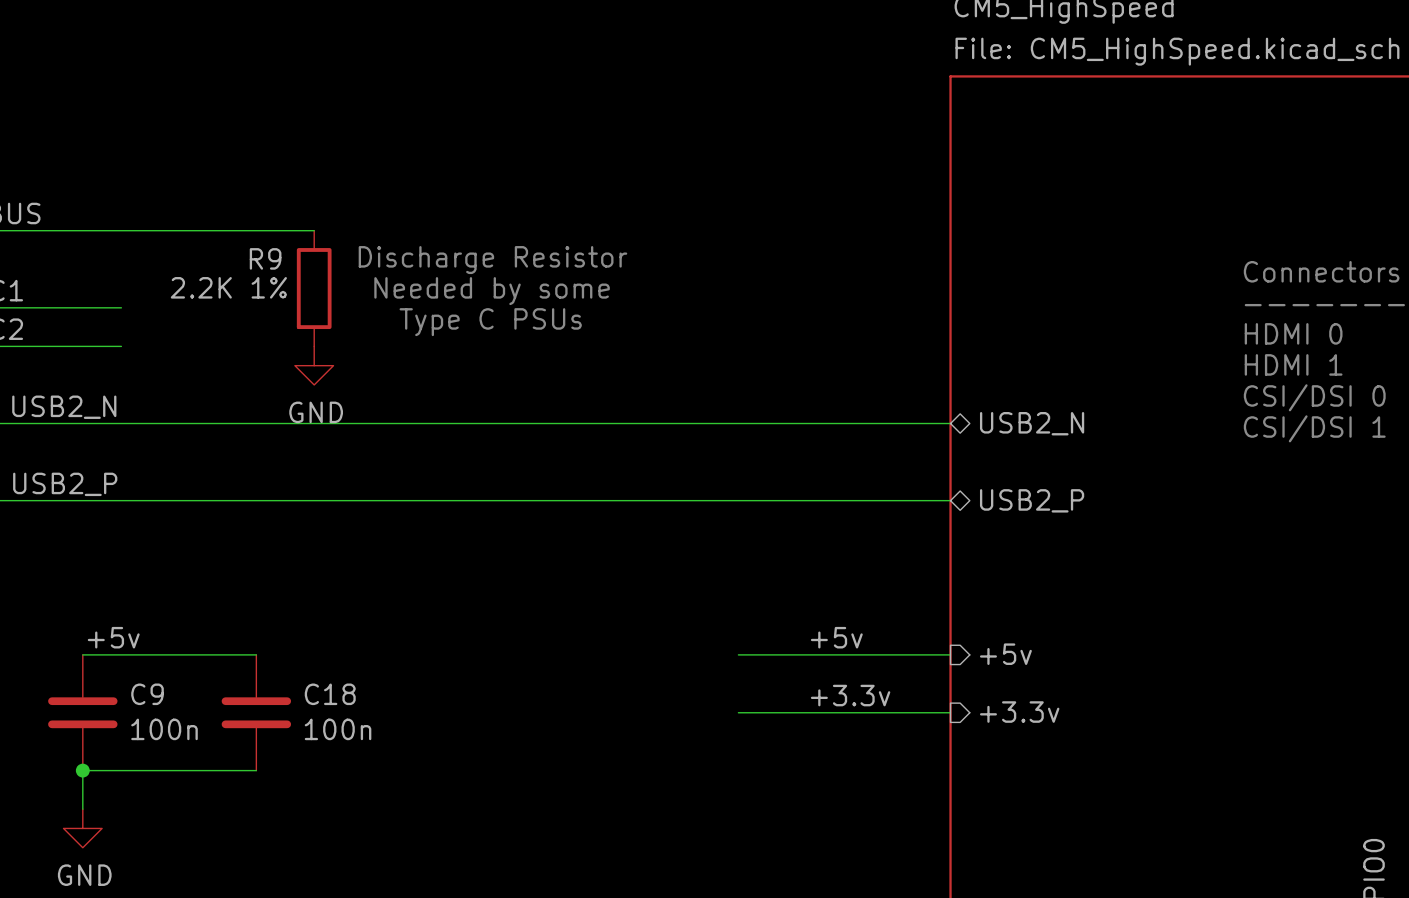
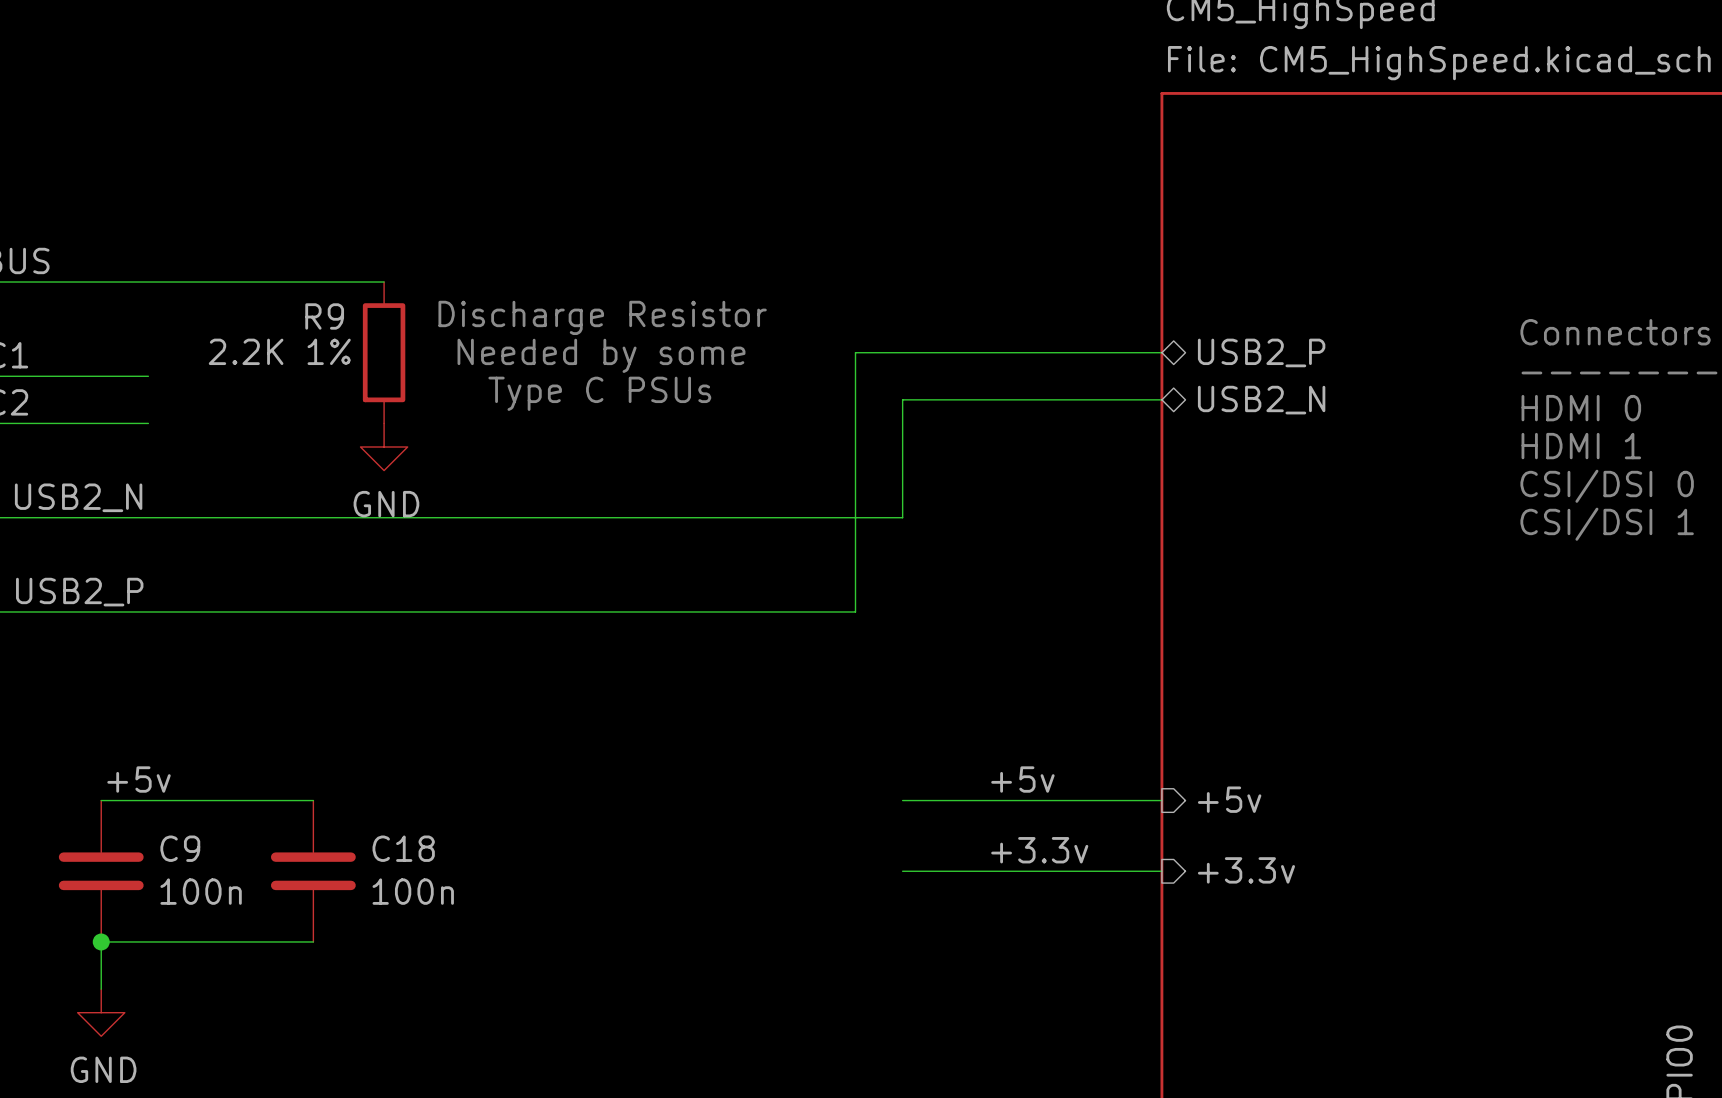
wire: (738, 423) (950, 423) -> (902, 517) (902, 399) (1161, 399)
sheet pin position: USB2_N (1032, 423) -> USB2_N (1261, 400)
wire: (699, 500) (950, 500) -> (855, 611) (855, 352) (1161, 352)
sheet pin position: USB2_P (1032, 500) -> USB2_P (1261, 352)

